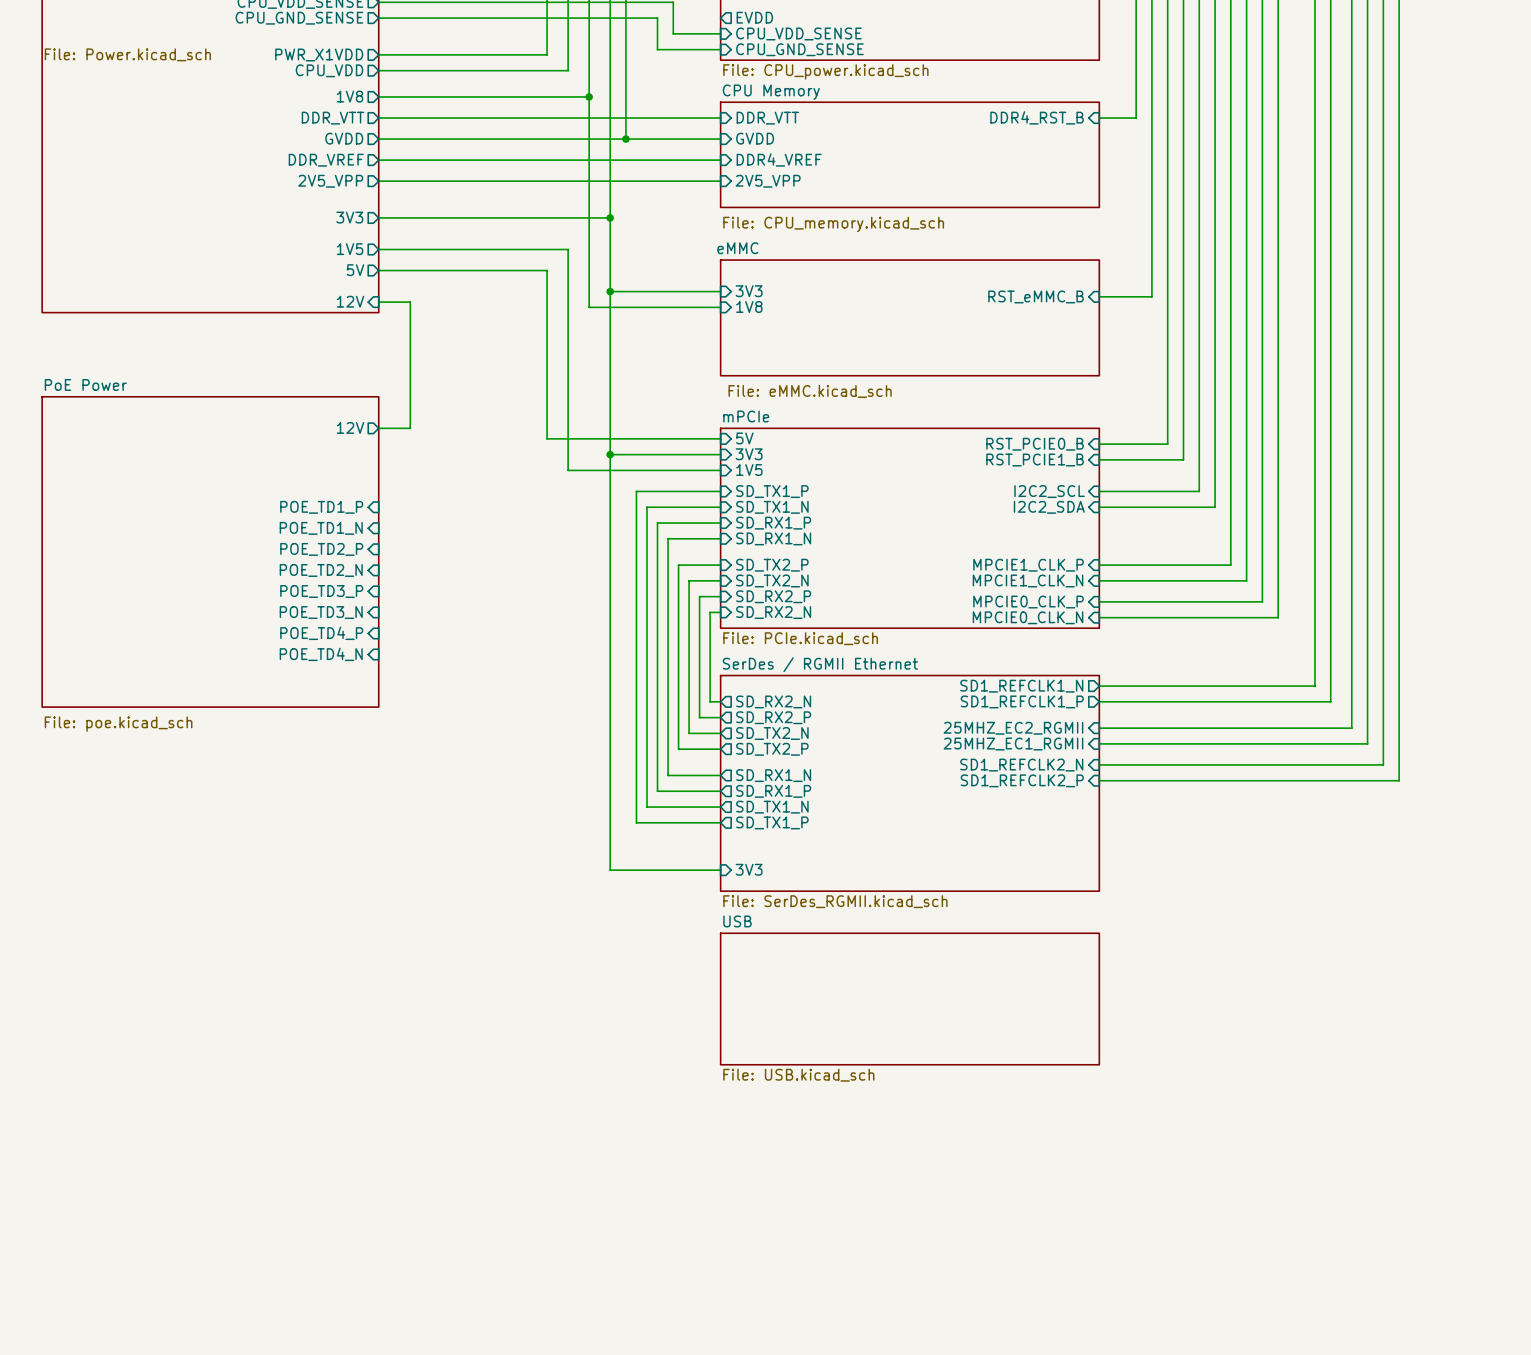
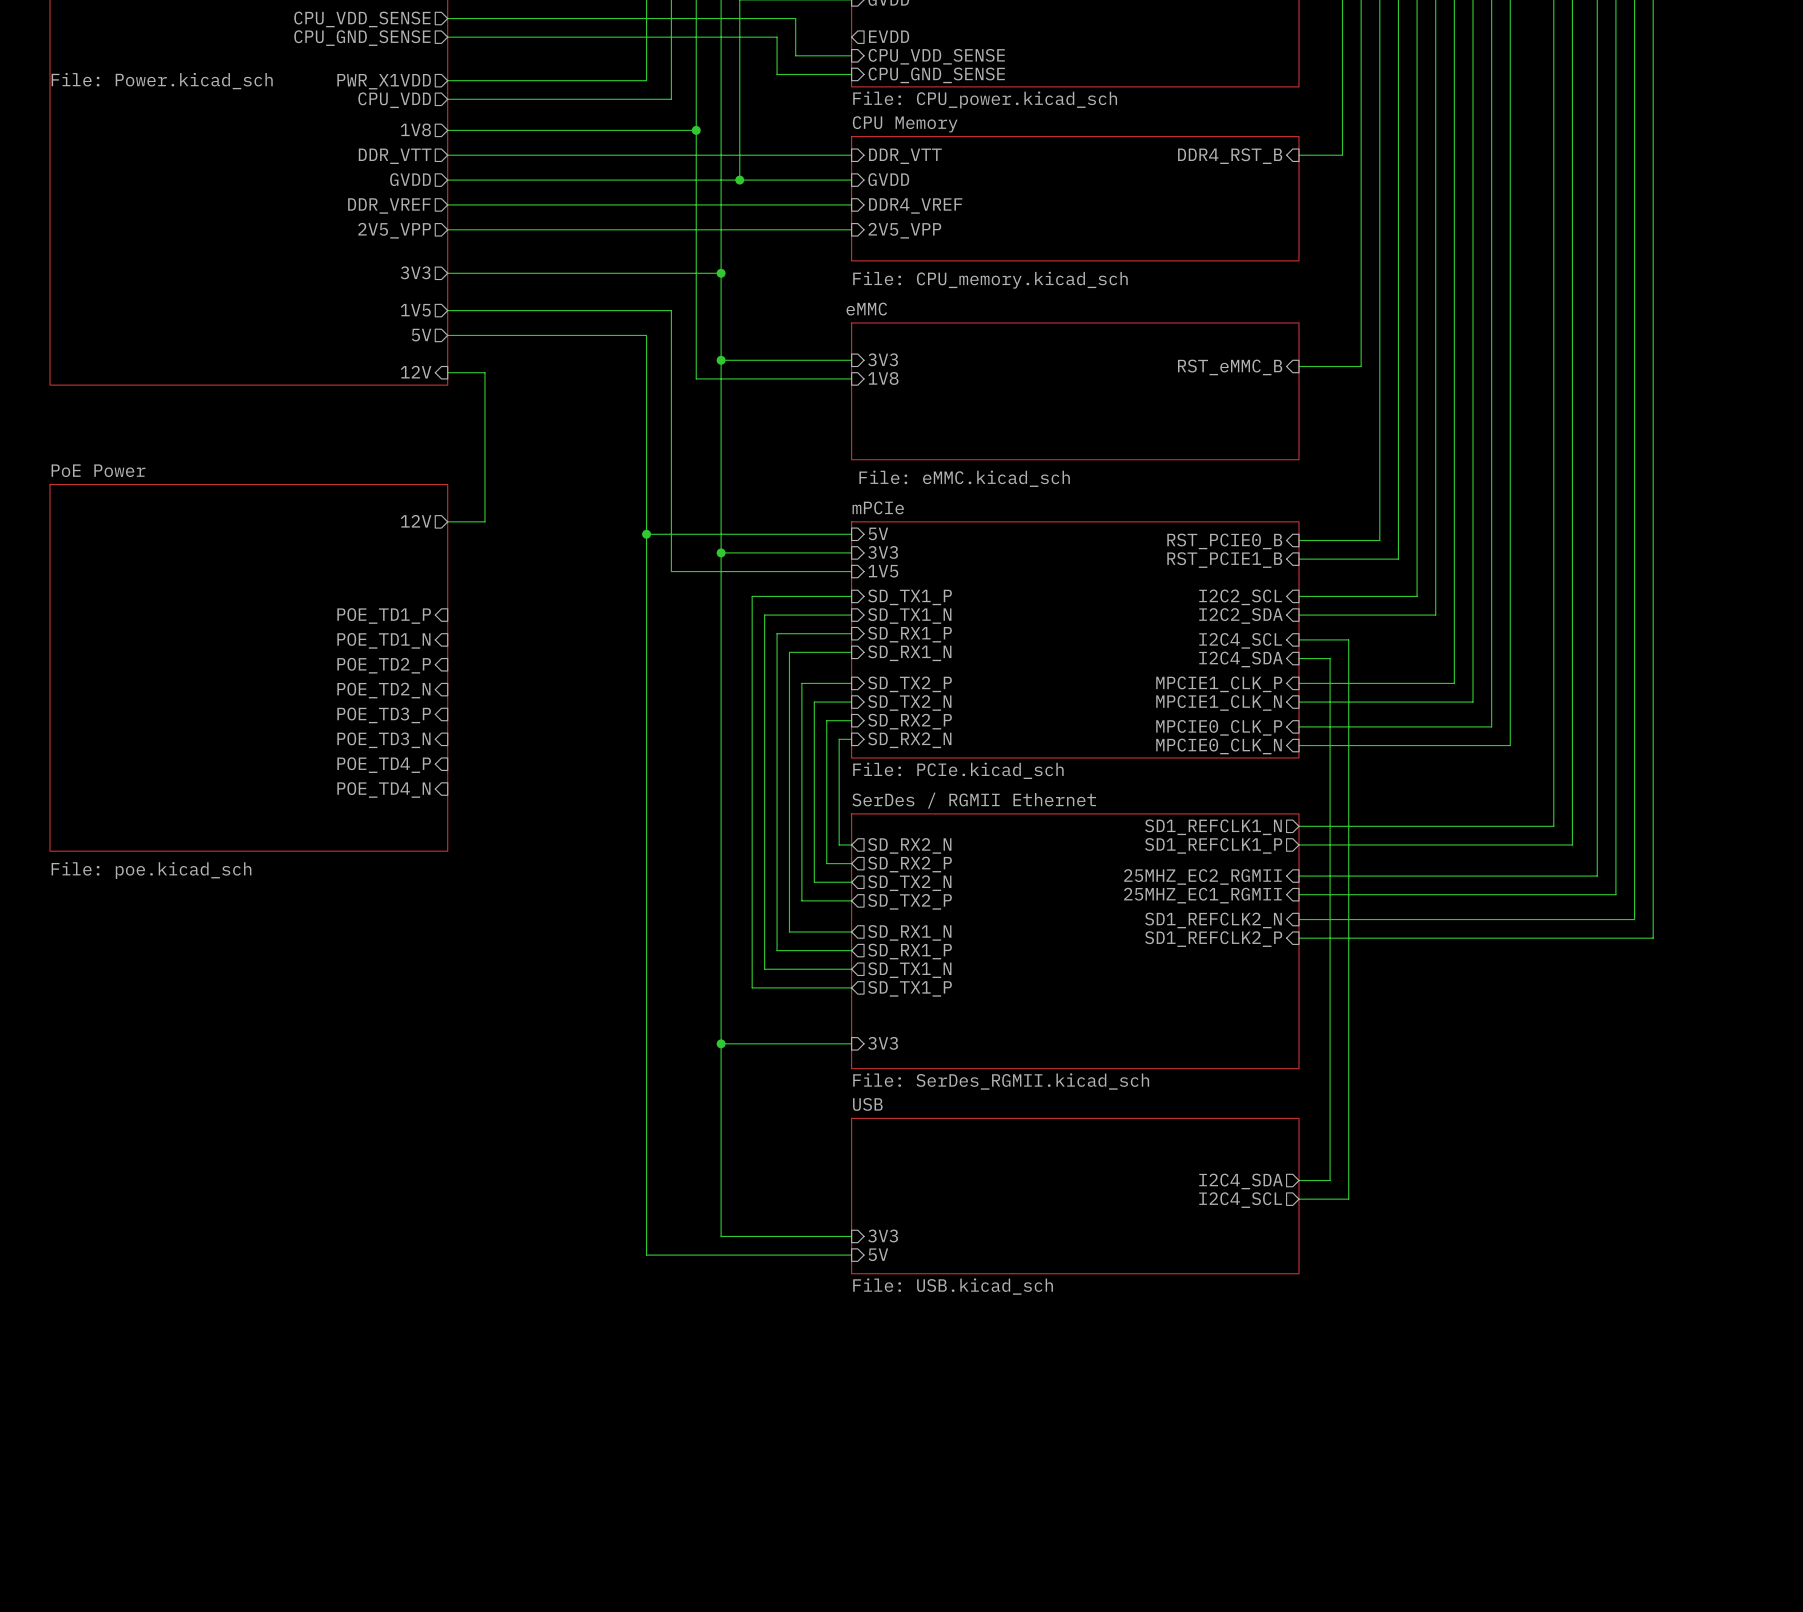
wire: none -> (646, 534) (646, 1255) (851, 1255)
junction: none -> (646, 534)
sheet pin: none -> I2C4_SCL (1240, 640)
wire: none -> (1299, 639) (1348, 639) (1348, 1199) (1299, 1199)
sheet pin: none -> I2C4_SDA (1240, 659)
wire: none -> (1299, 658) (1330, 658) (1330, 1180) (1299, 1180)
wire: none -> (721, 1043) (721, 1236) (851, 1236)
junction: none -> (721, 1043)
sheet pin: none -> I2C4_SDA (1240, 1181)
sheet pin: none -> I2C4_SCL (1240, 1200)
sheet pin: none -> 3V3 (883, 1235)
sheet pin: none -> 5V (878, 1254)

